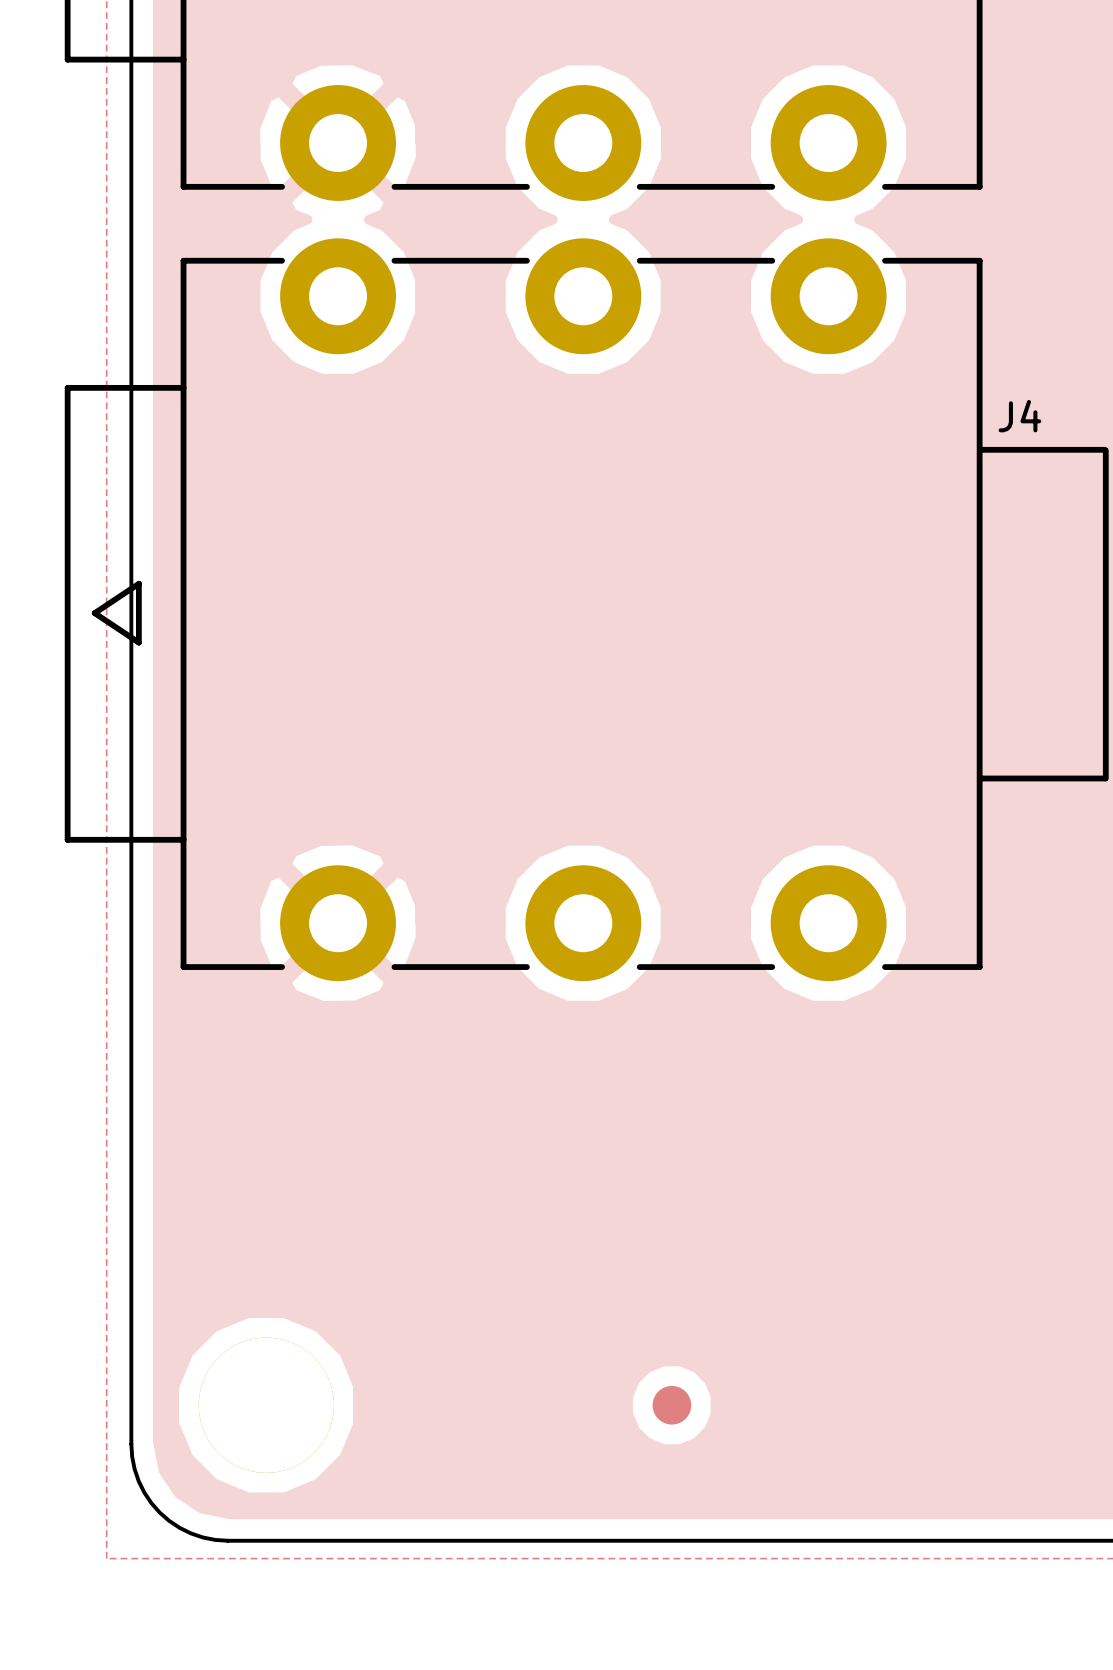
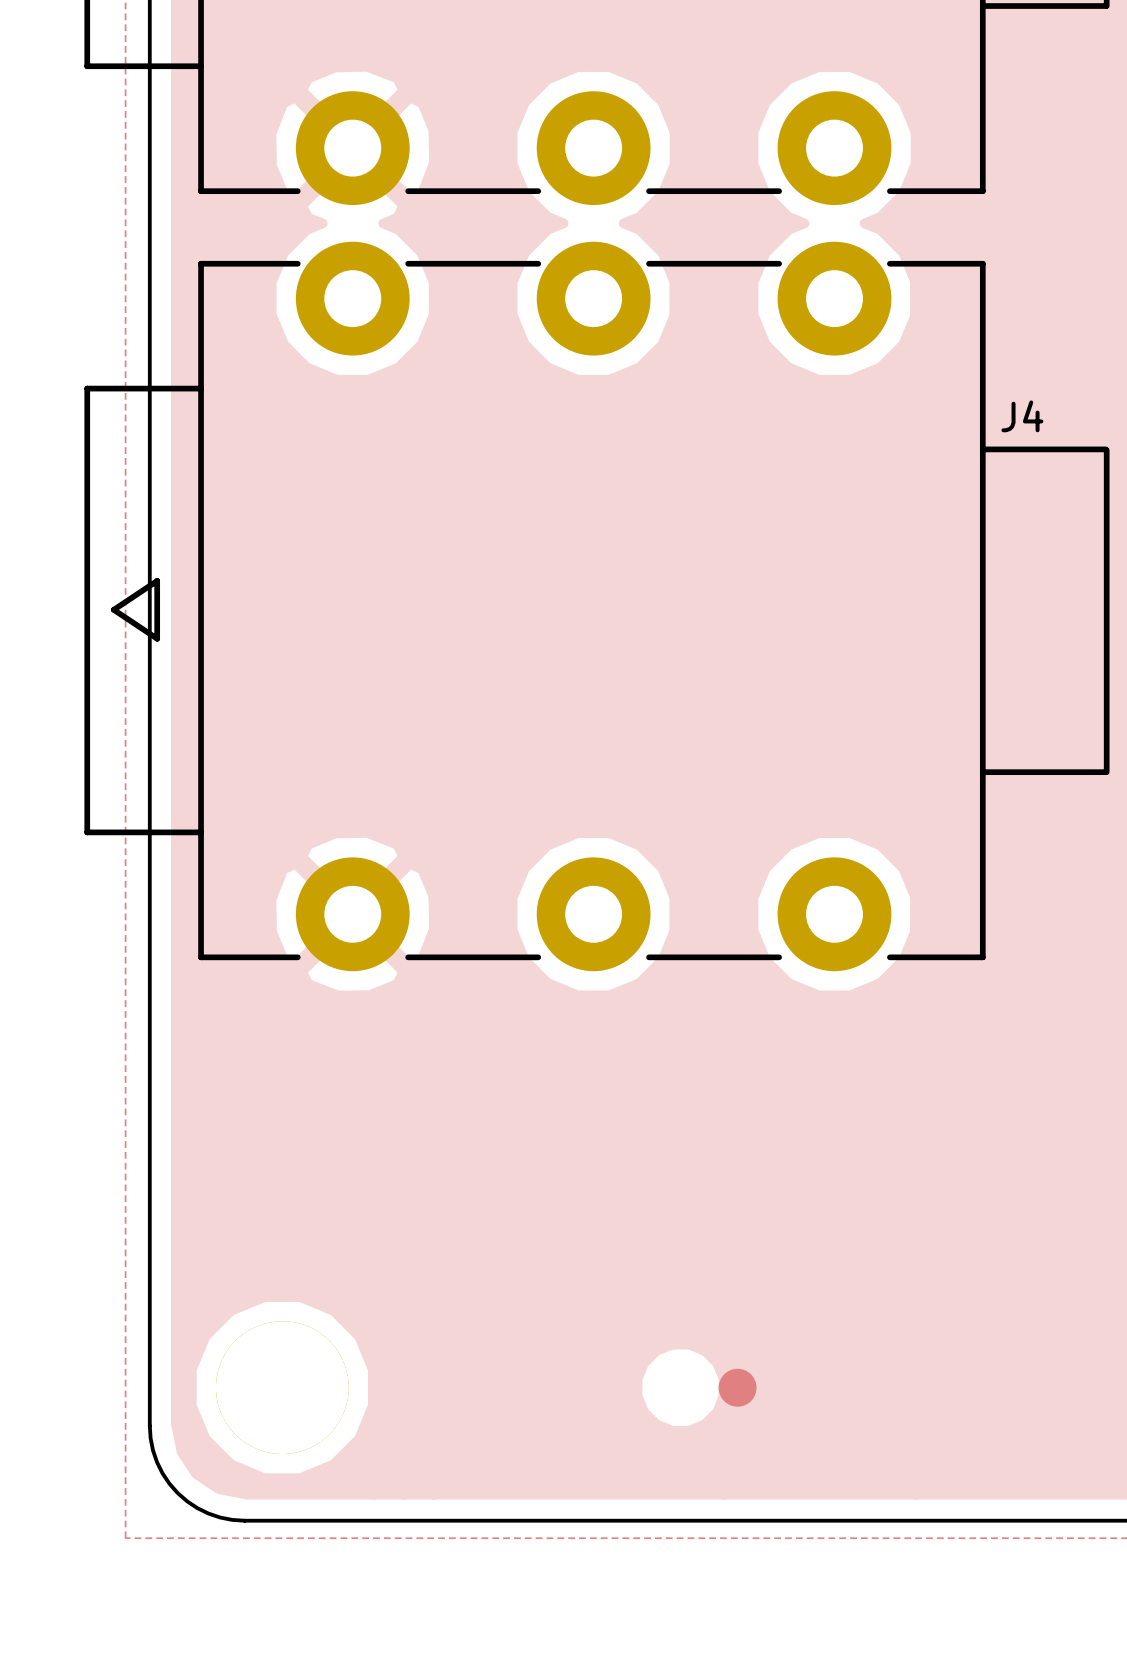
part position: (671, 1405) -> (737, 1387)

